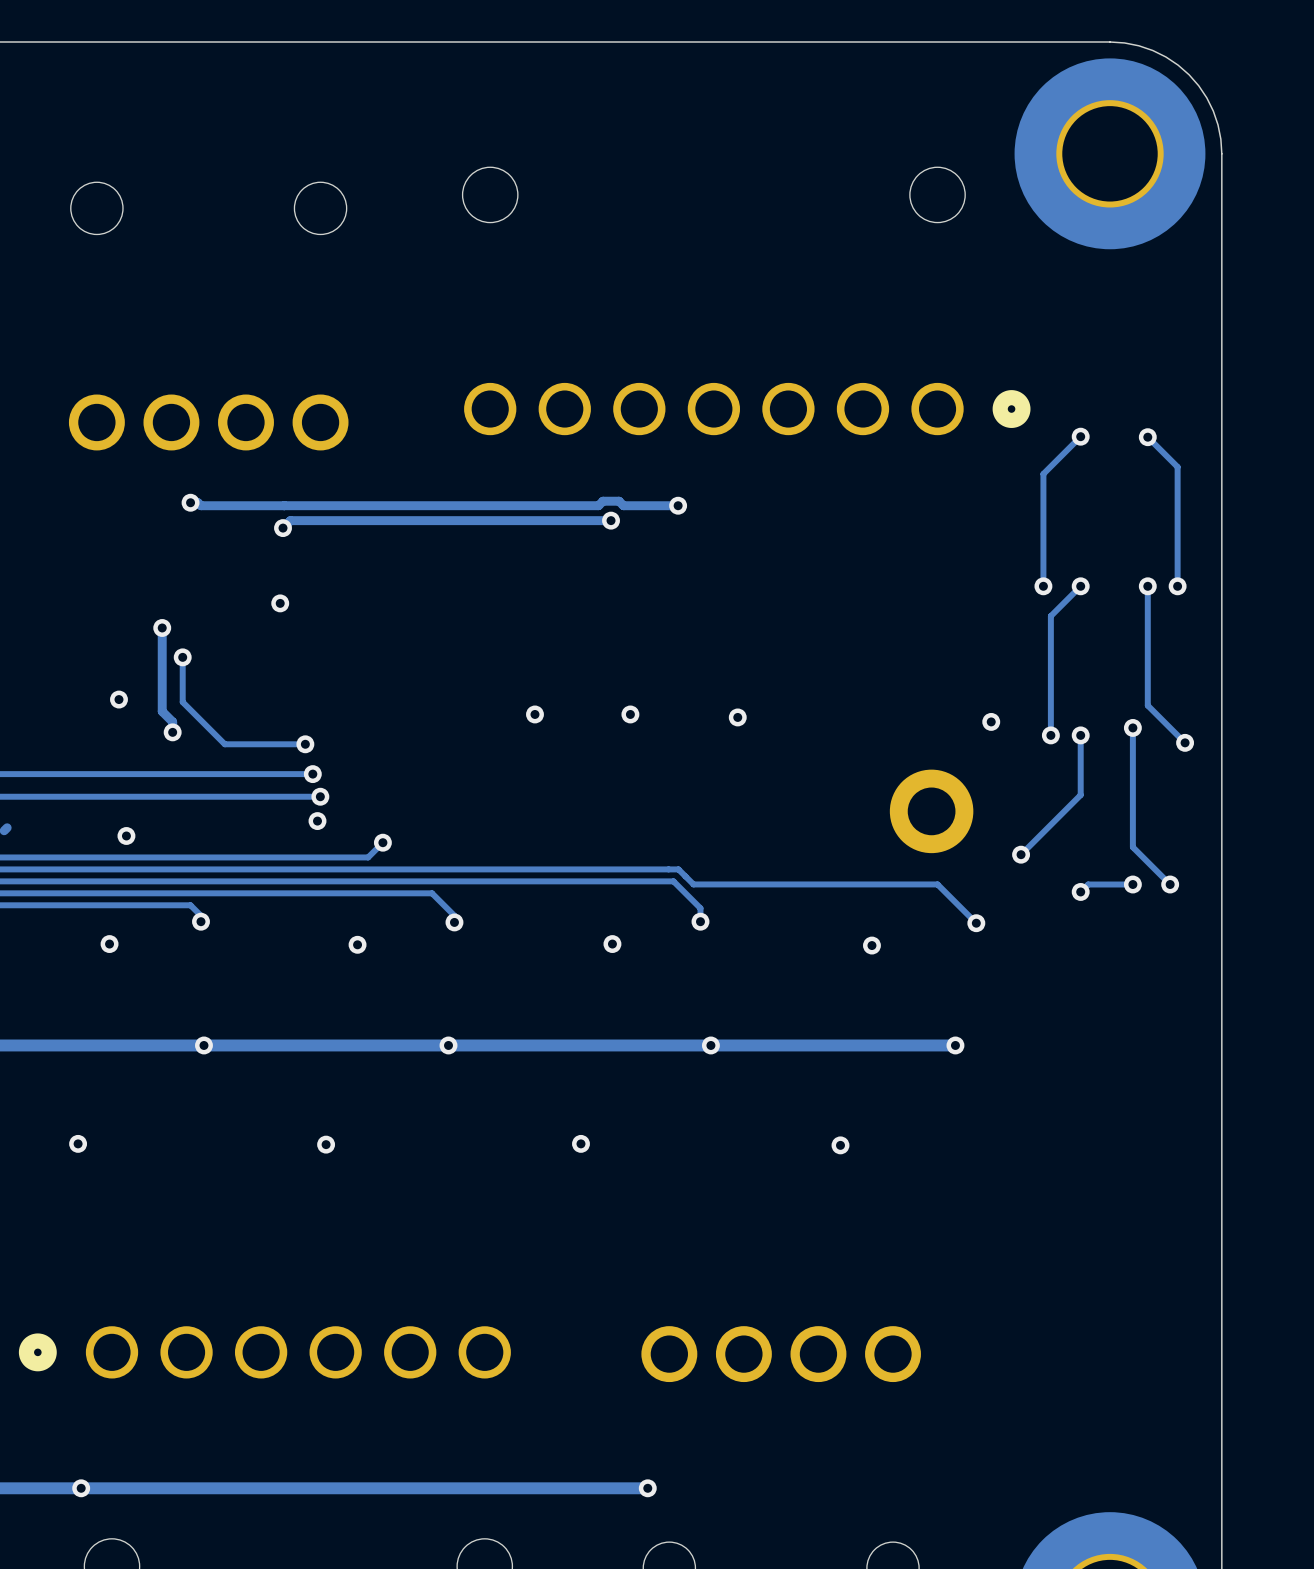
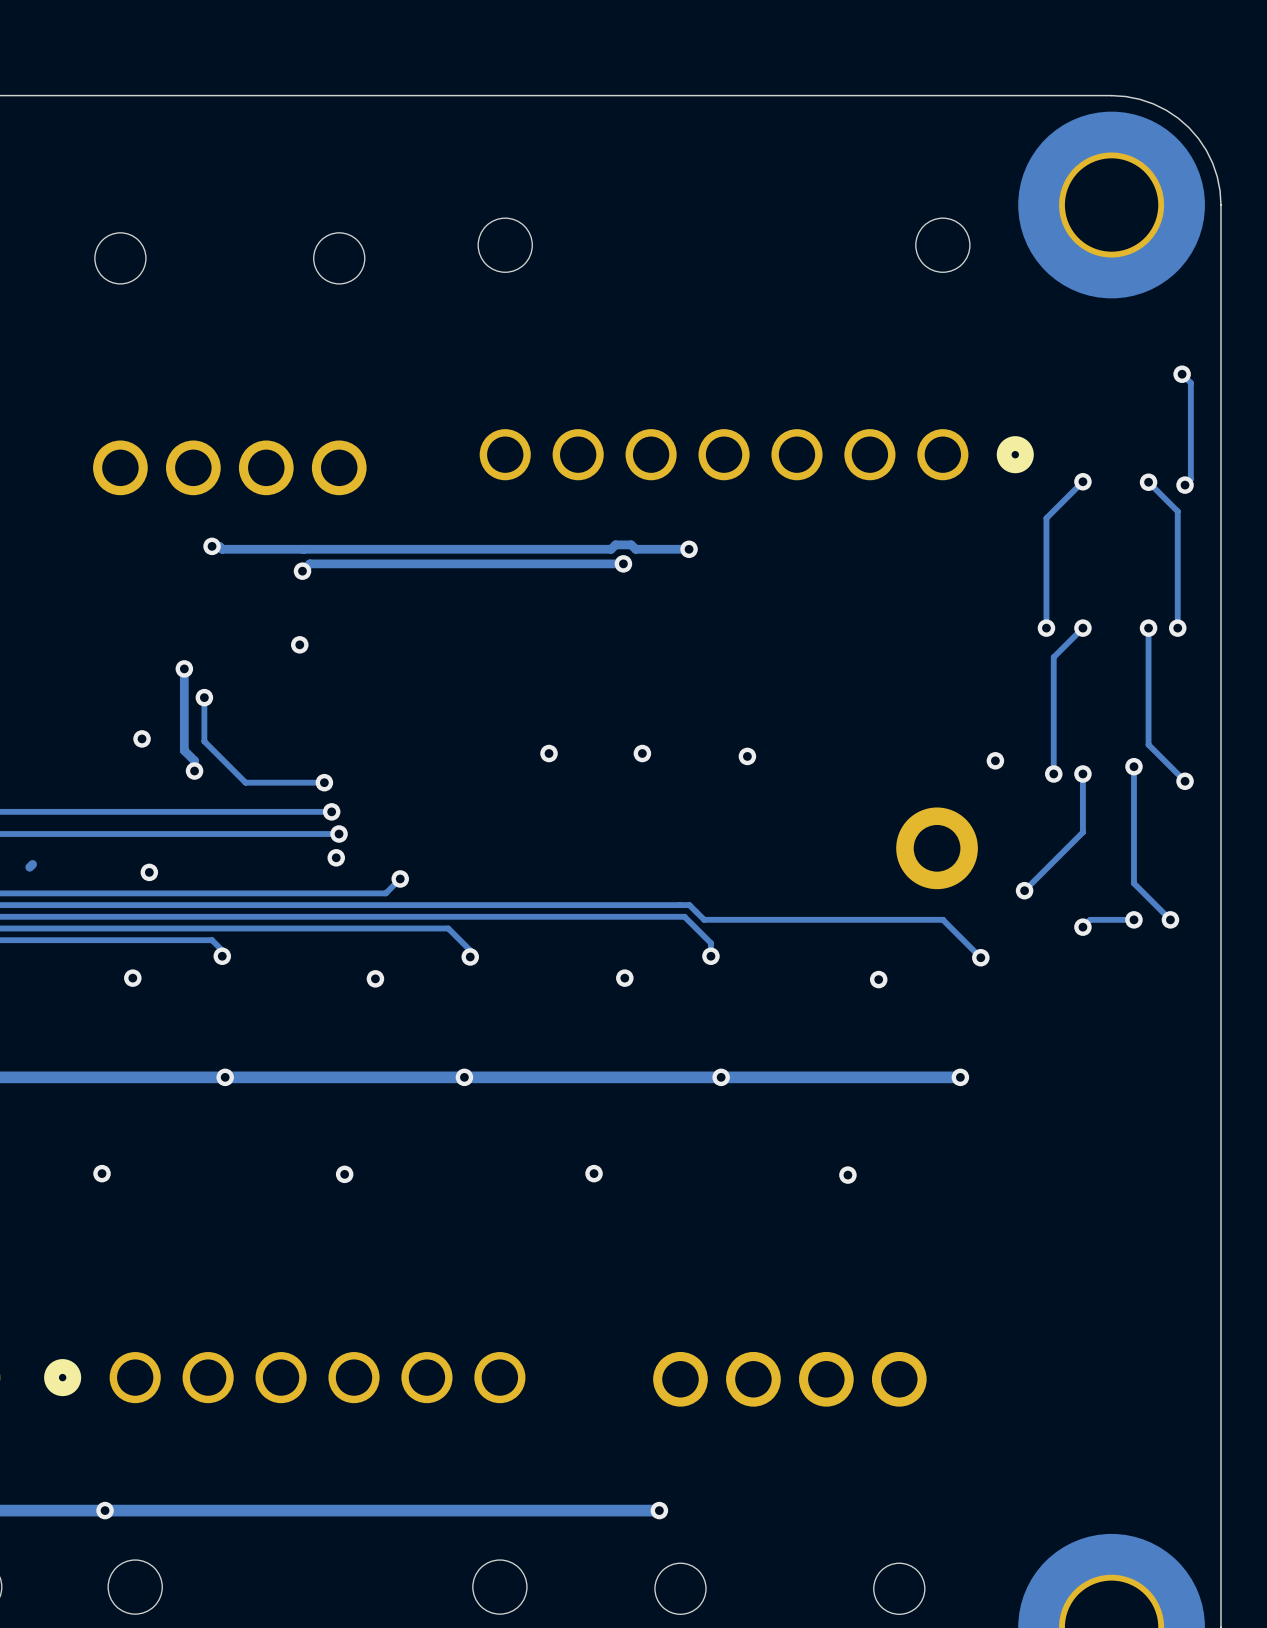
track: none -> (1182, 374) (1190, 382) (1190, 479) (1185, 485)
via: none -> (1182, 374)
via: none -> (1185, 485)

